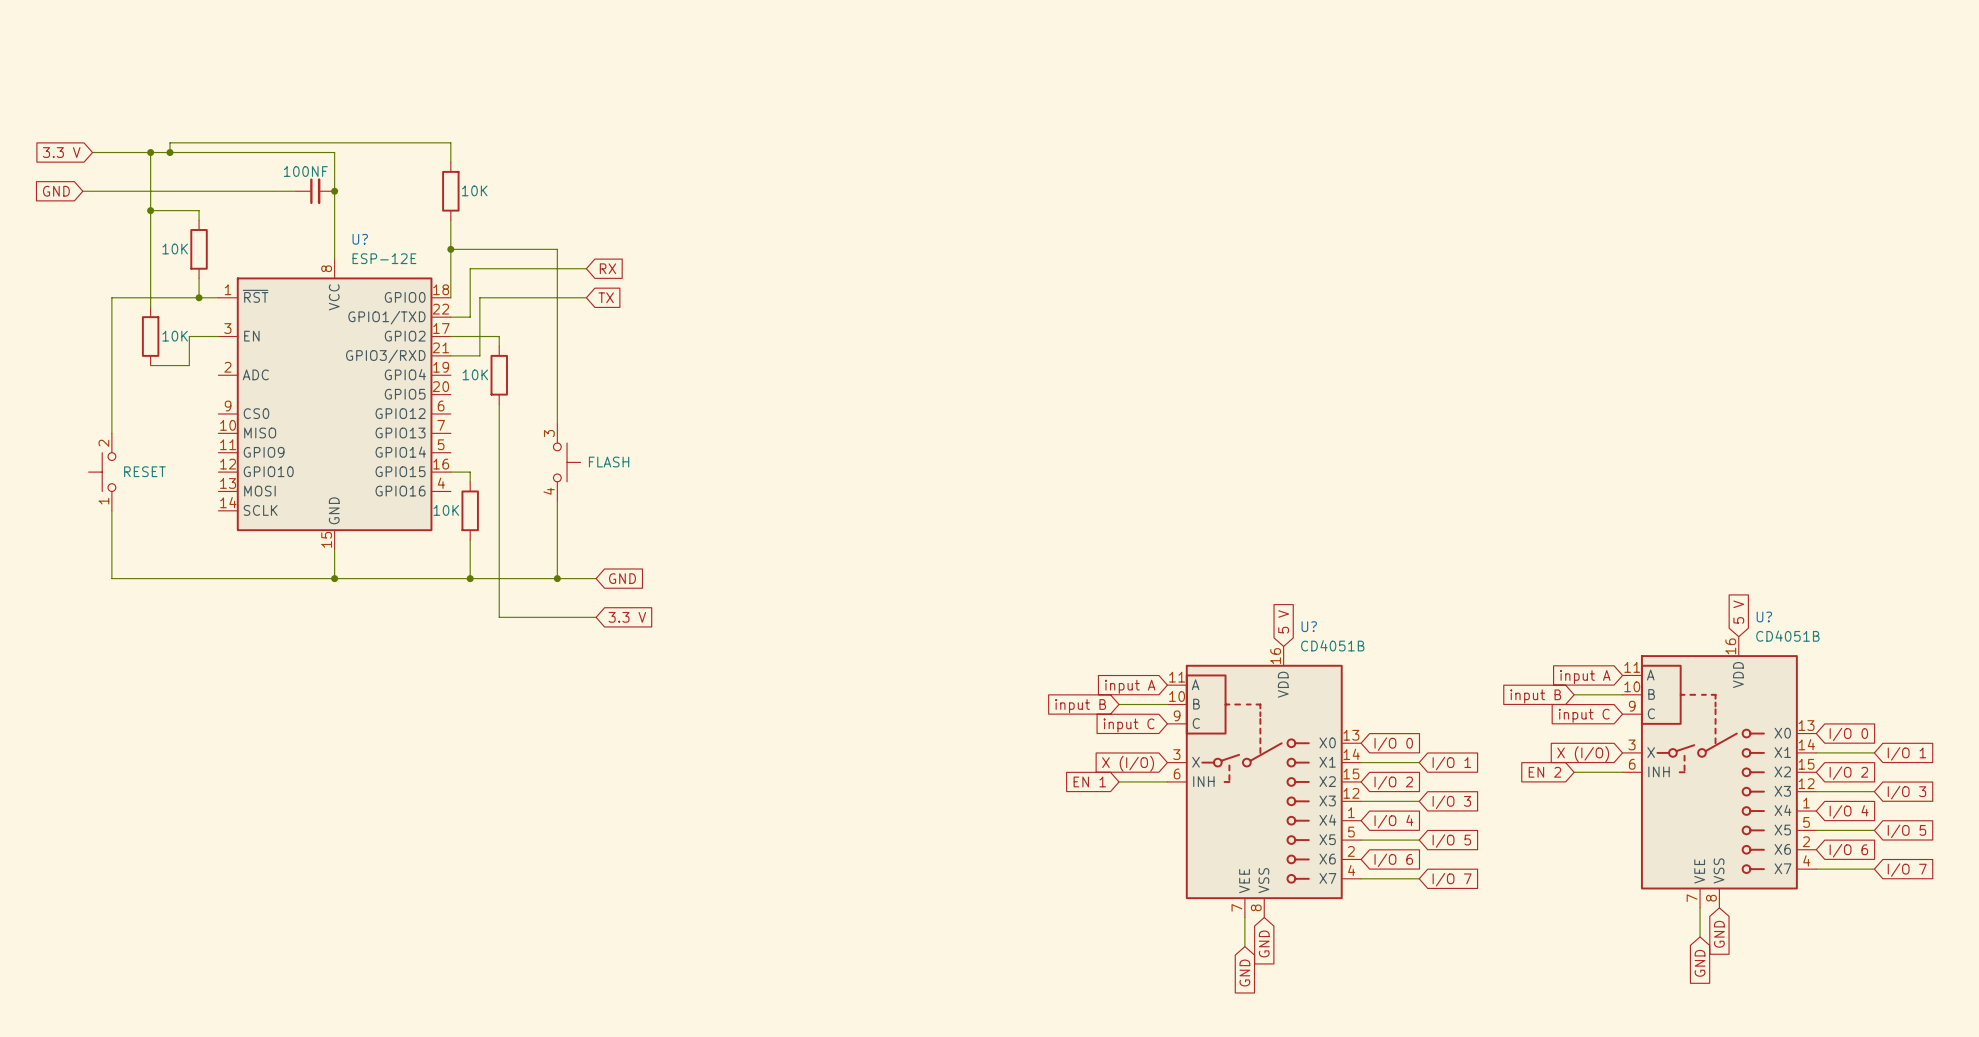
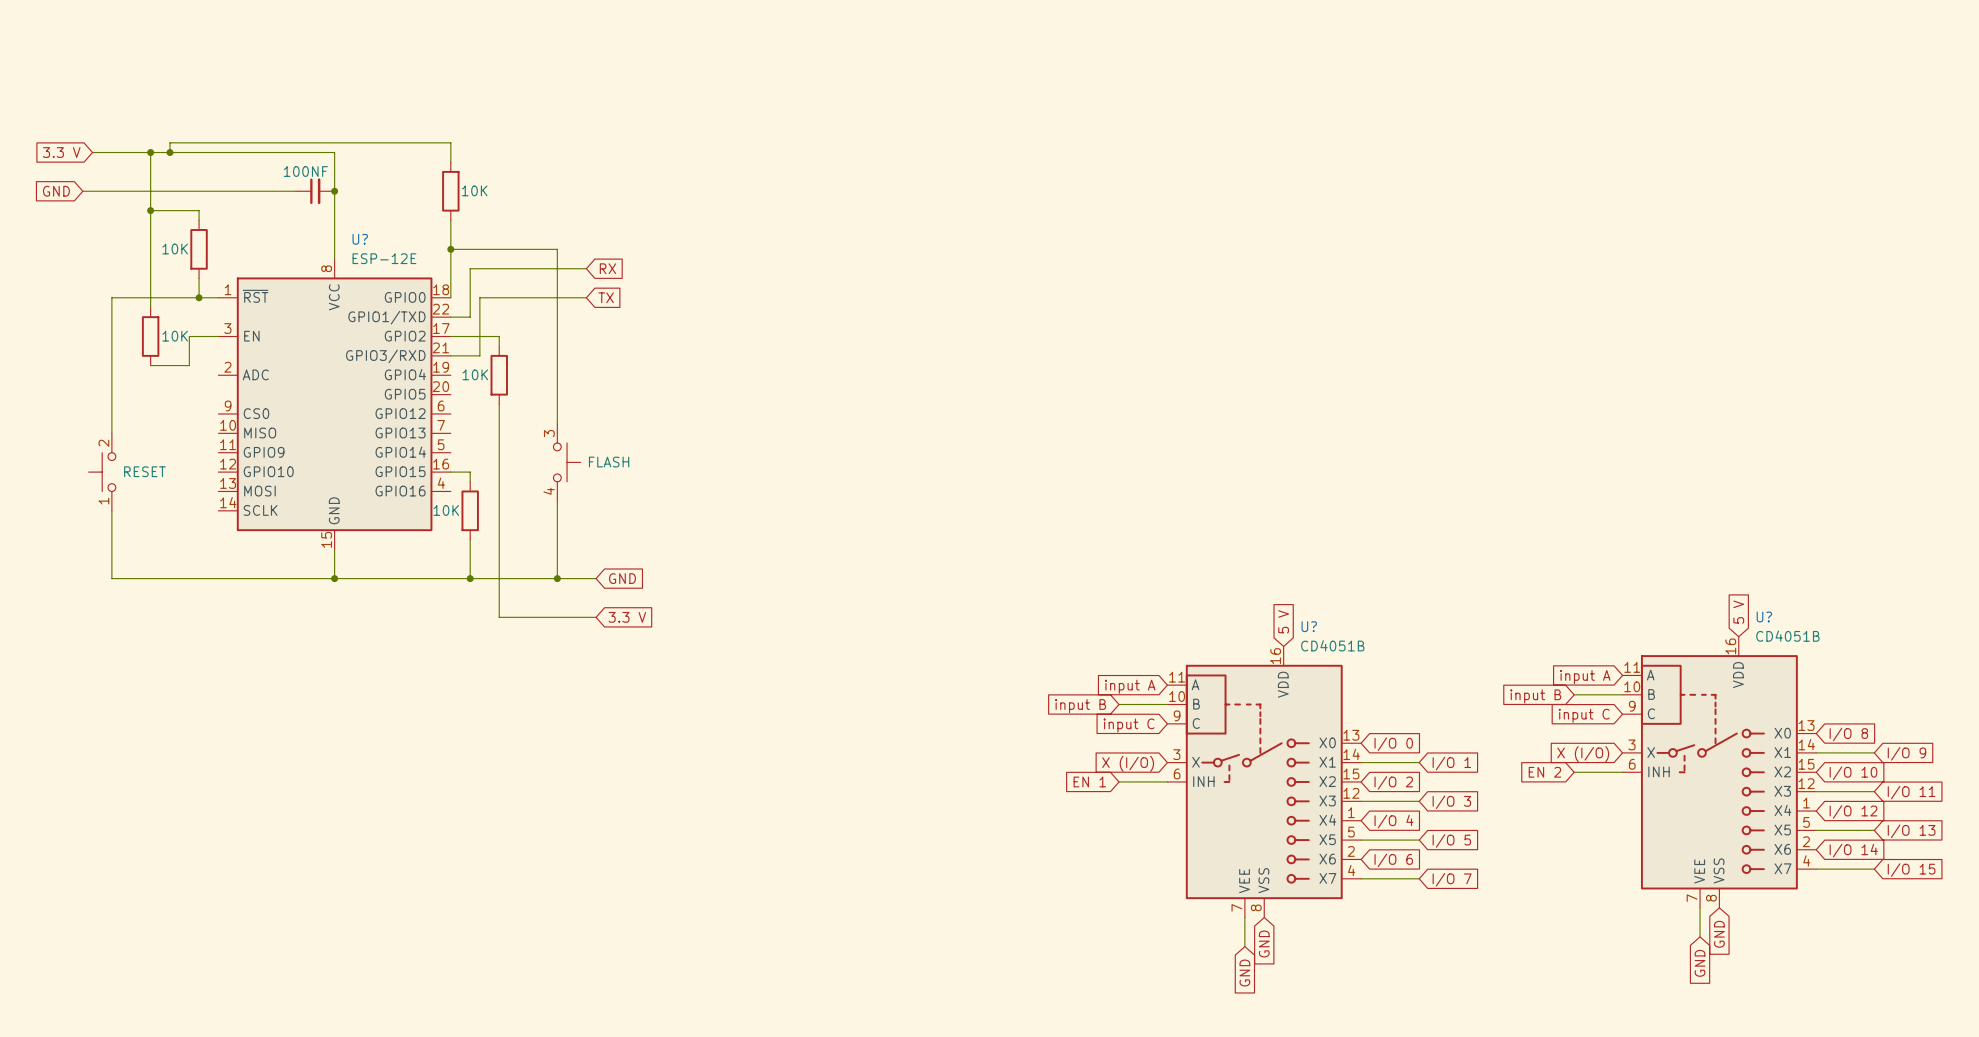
global label: I/O 0 (1848, 734) -> I/O 8 (1848, 734)
global label: I/O 1 (1906, 753) -> I/O 9 (1906, 753)
global label: I/O 2 (1848, 773) -> I/O 10 (1853, 773)
global label: I/O 3 (1906, 792) -> I/O 11 (1911, 792)
global label: I/O 4 (1849, 811) -> I/O 12 (1853, 811)
global label: I/O 5 (1906, 831) -> I/O 13 (1911, 831)
global label: I/O 6 (1848, 850) -> I/O 14 (1853, 850)
global label: I/O 7 (1907, 870) -> I/O 15 (1911, 870)

